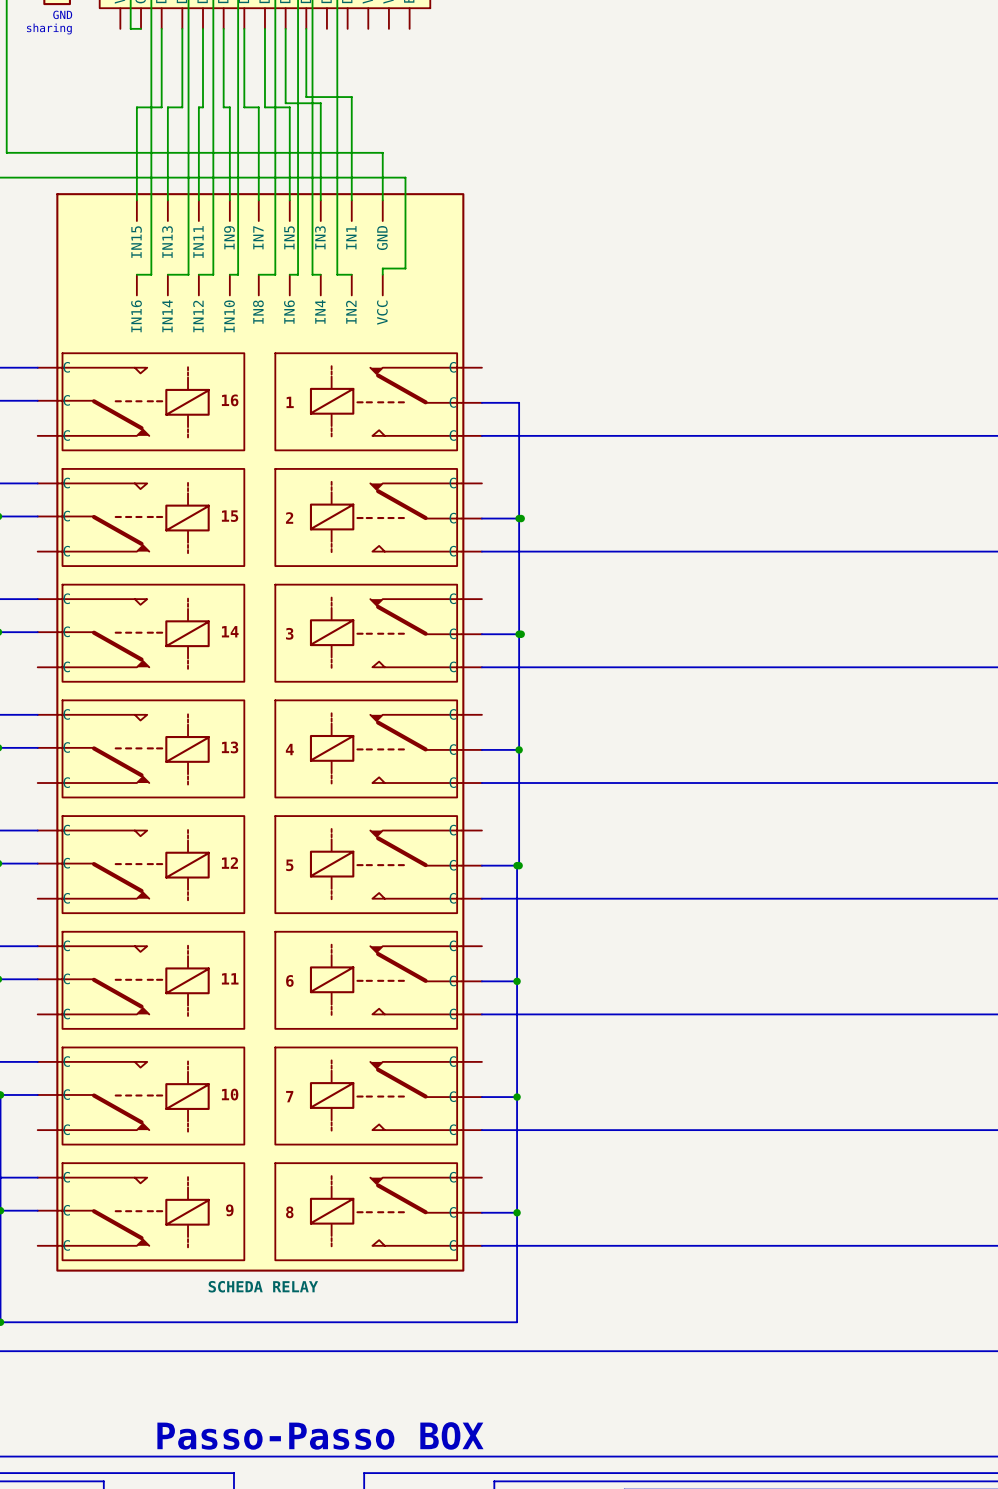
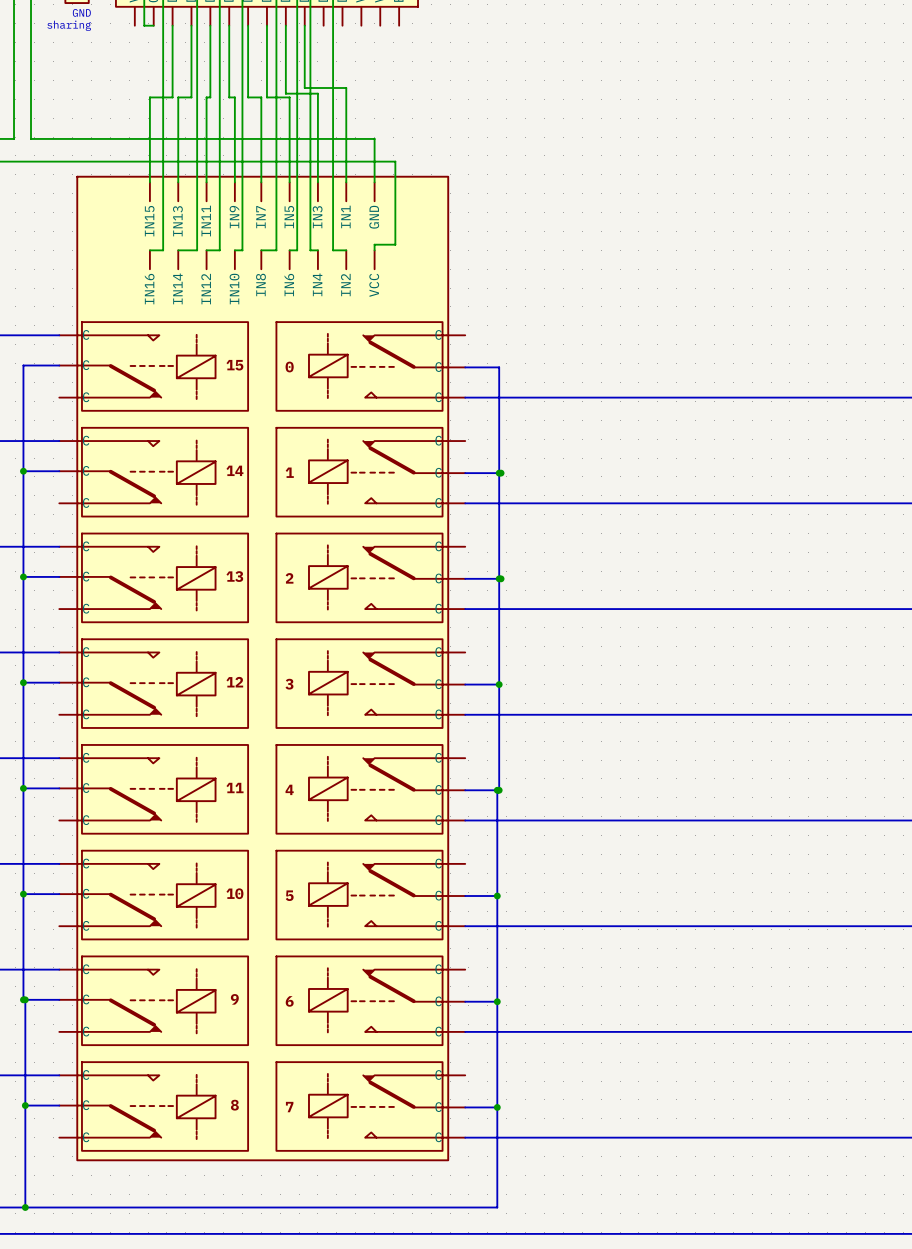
part symbol: [37, 193, 482, 1272] -> [59, 175, 466, 1162]
part value: SCHEDA RELAY (263, 1286) -> none

